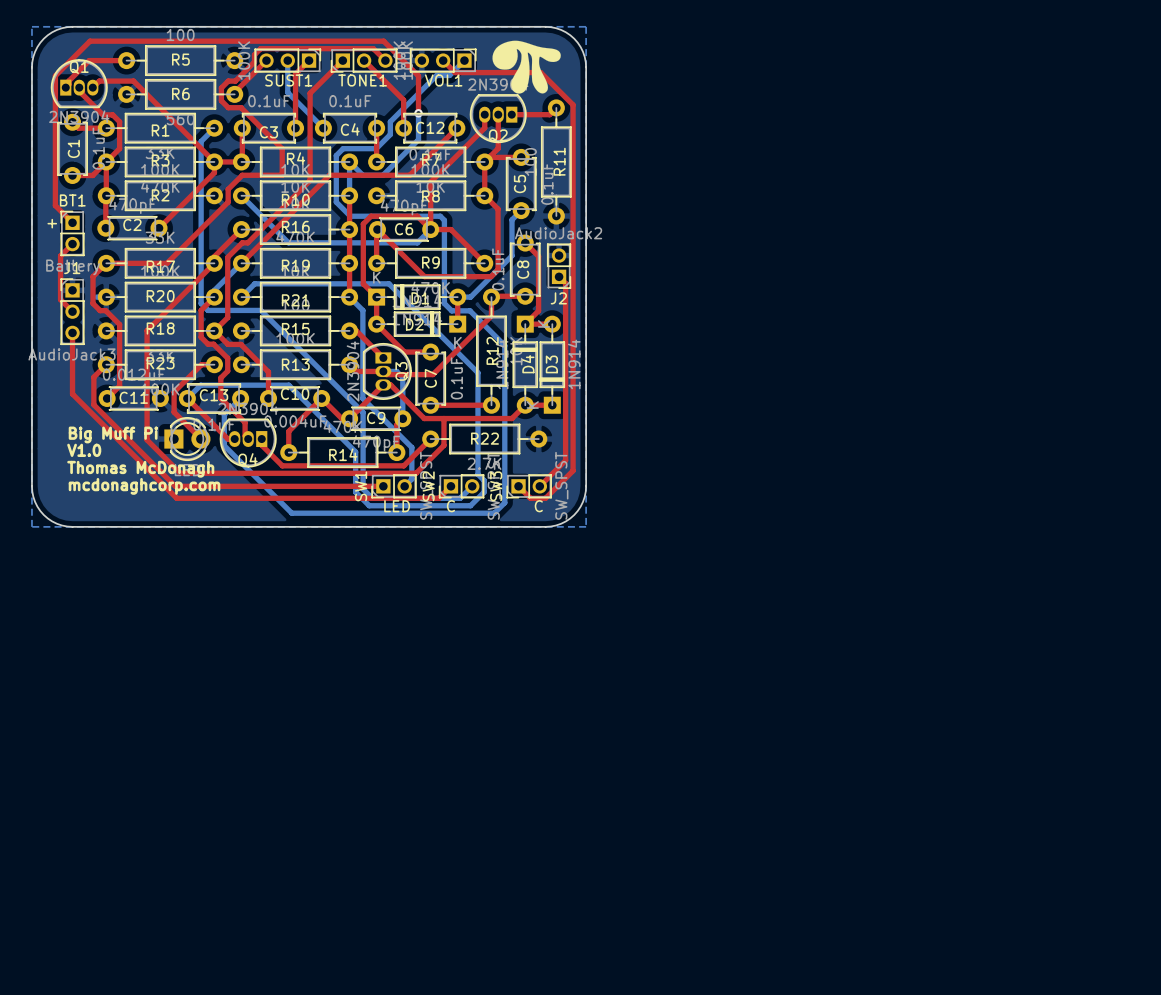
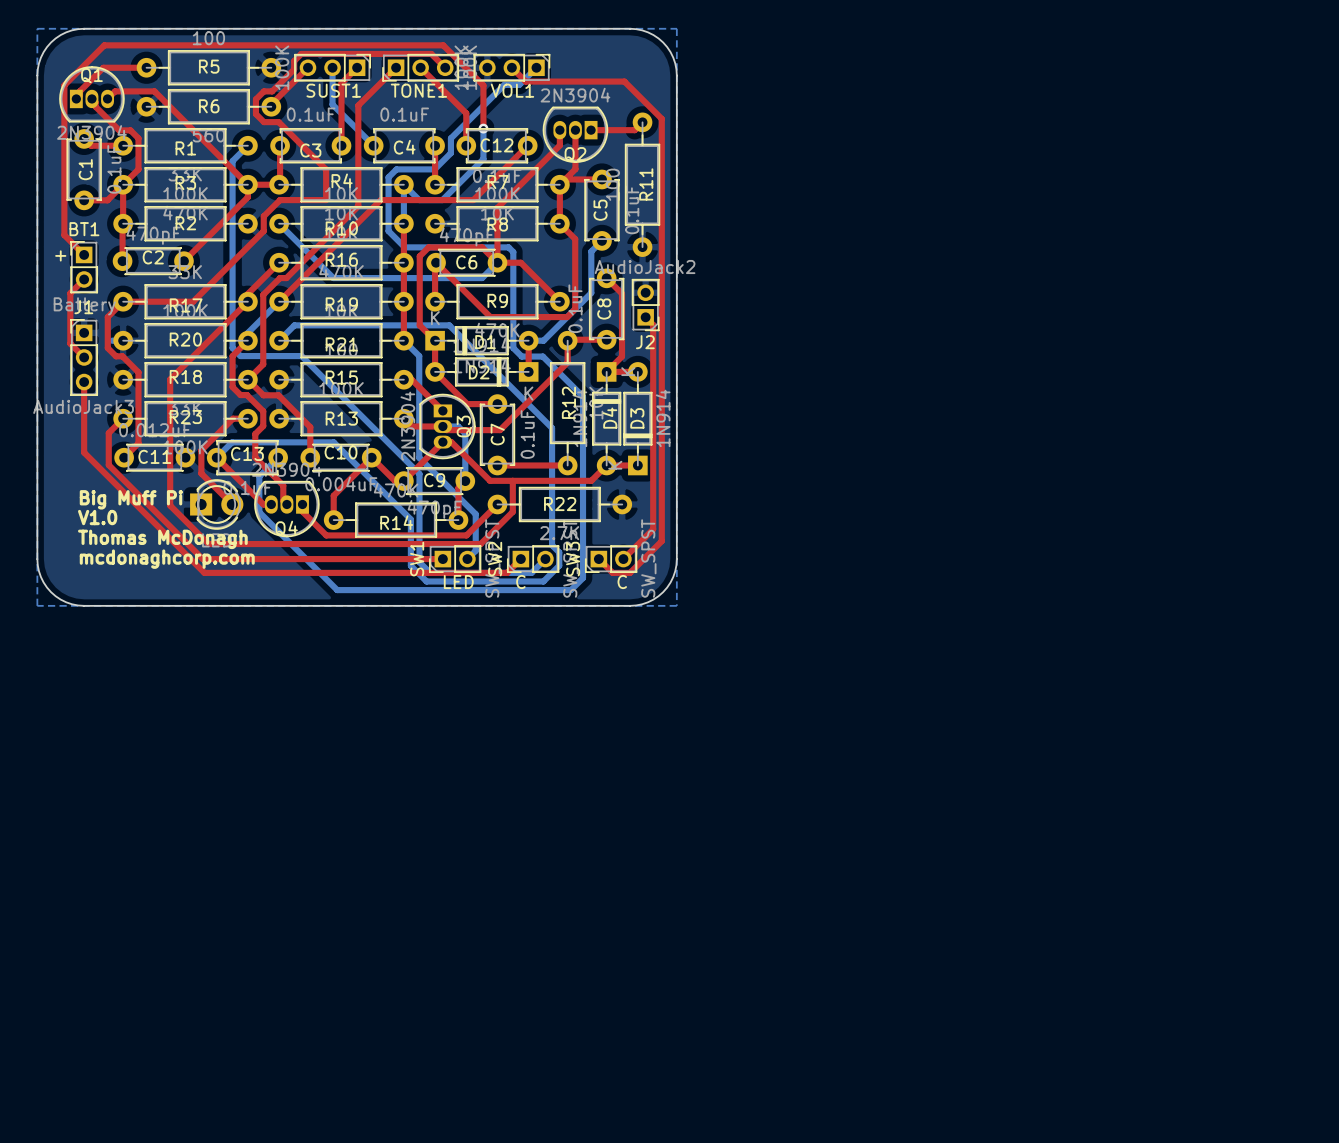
drawing: [492, 40, 561, 94] -> none

